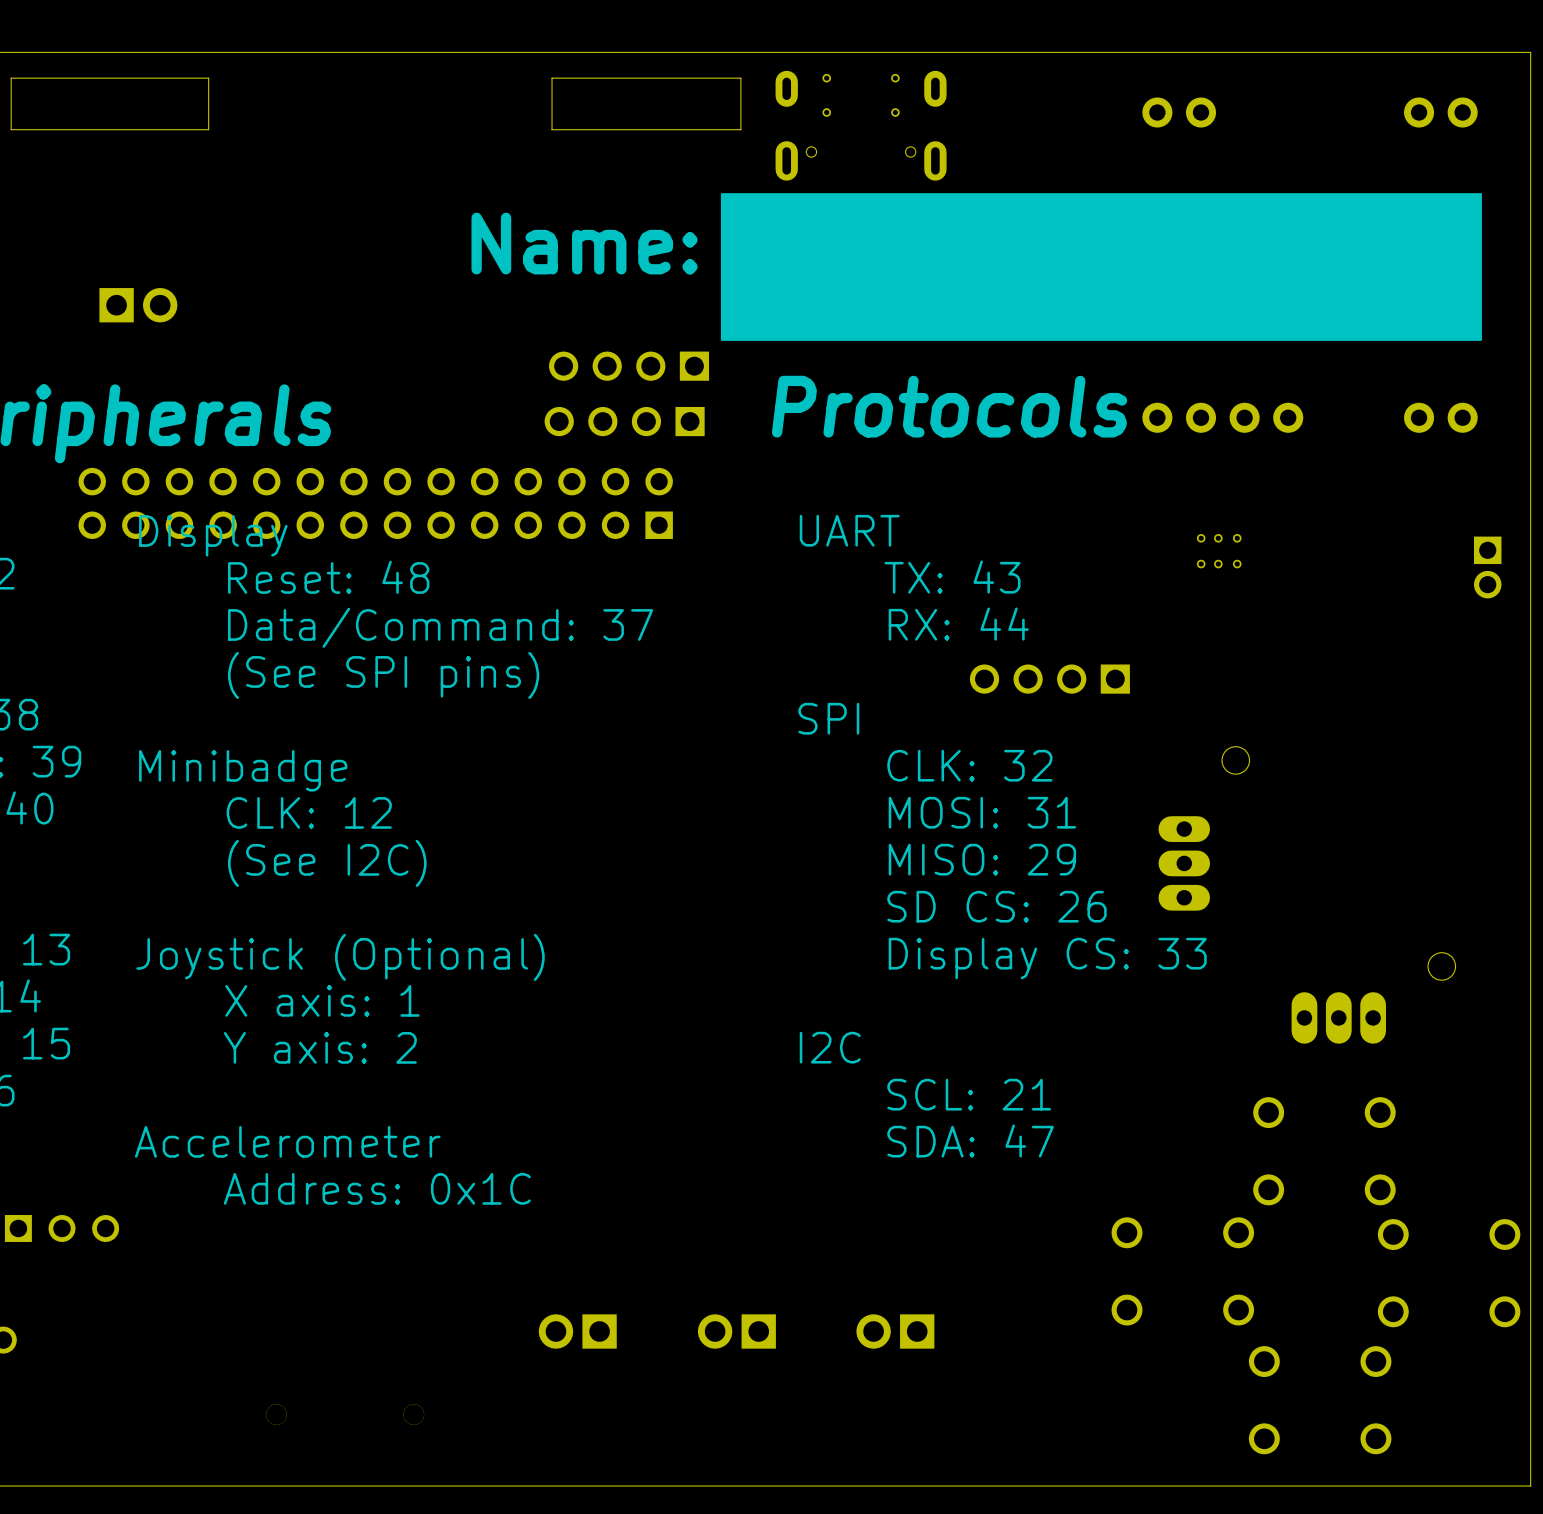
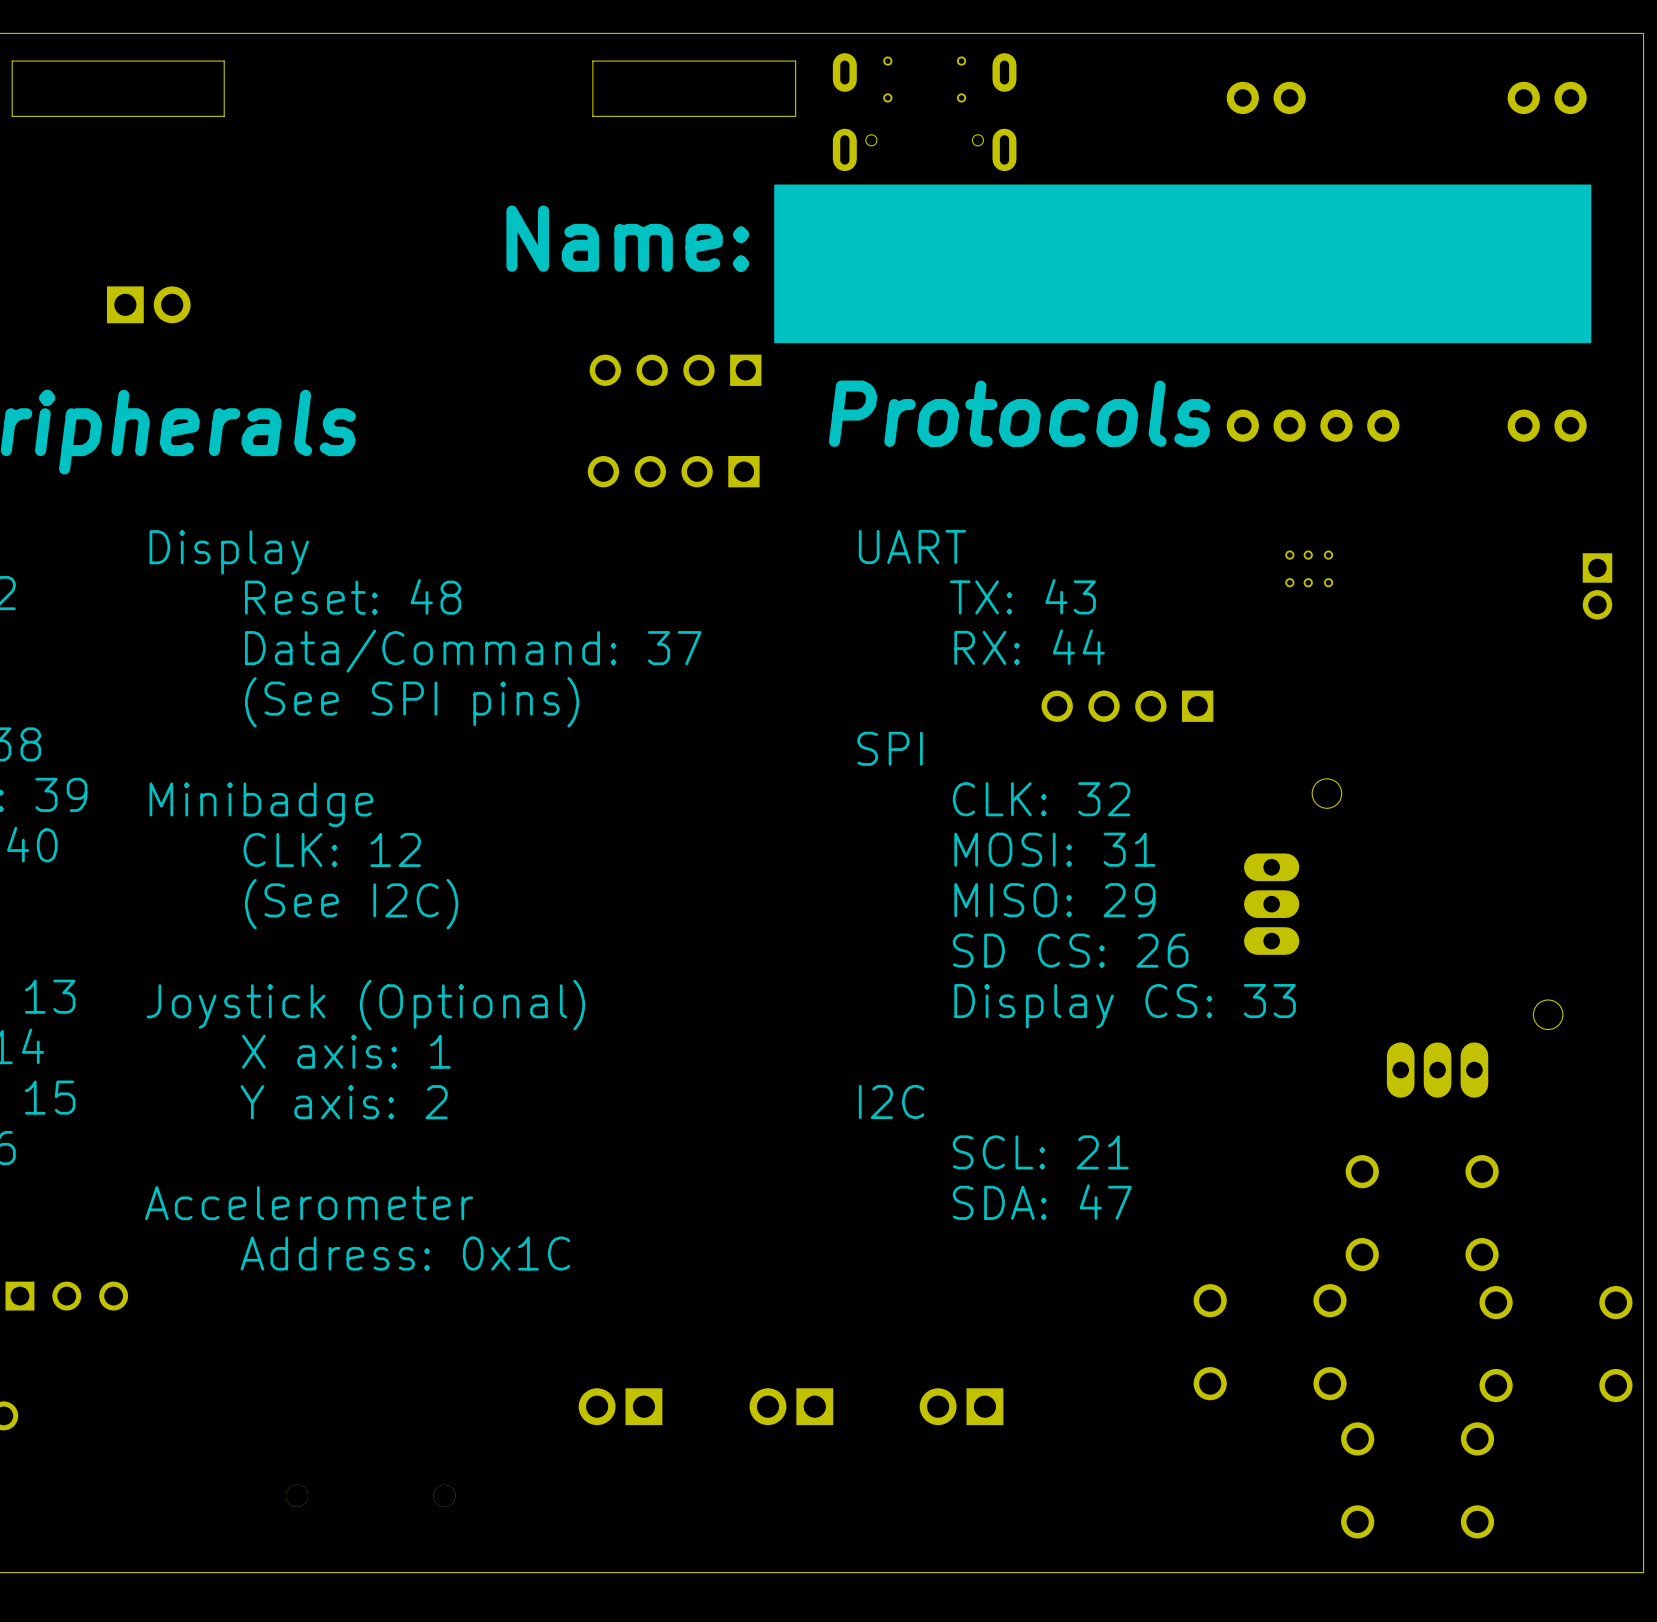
part position: (624, 421) -> (673, 471)
part: (375, 503) -> none

